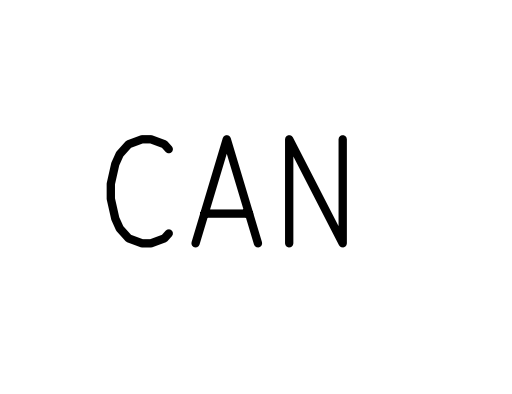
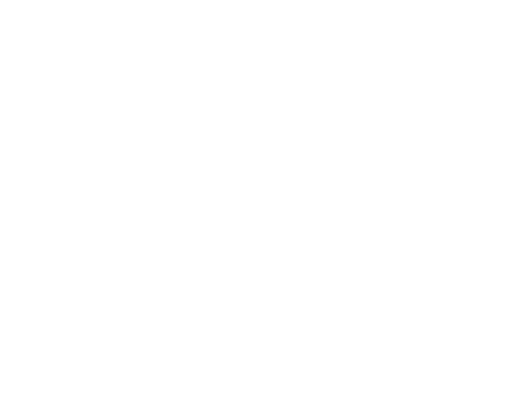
text: CAN (226, 191) -> none

